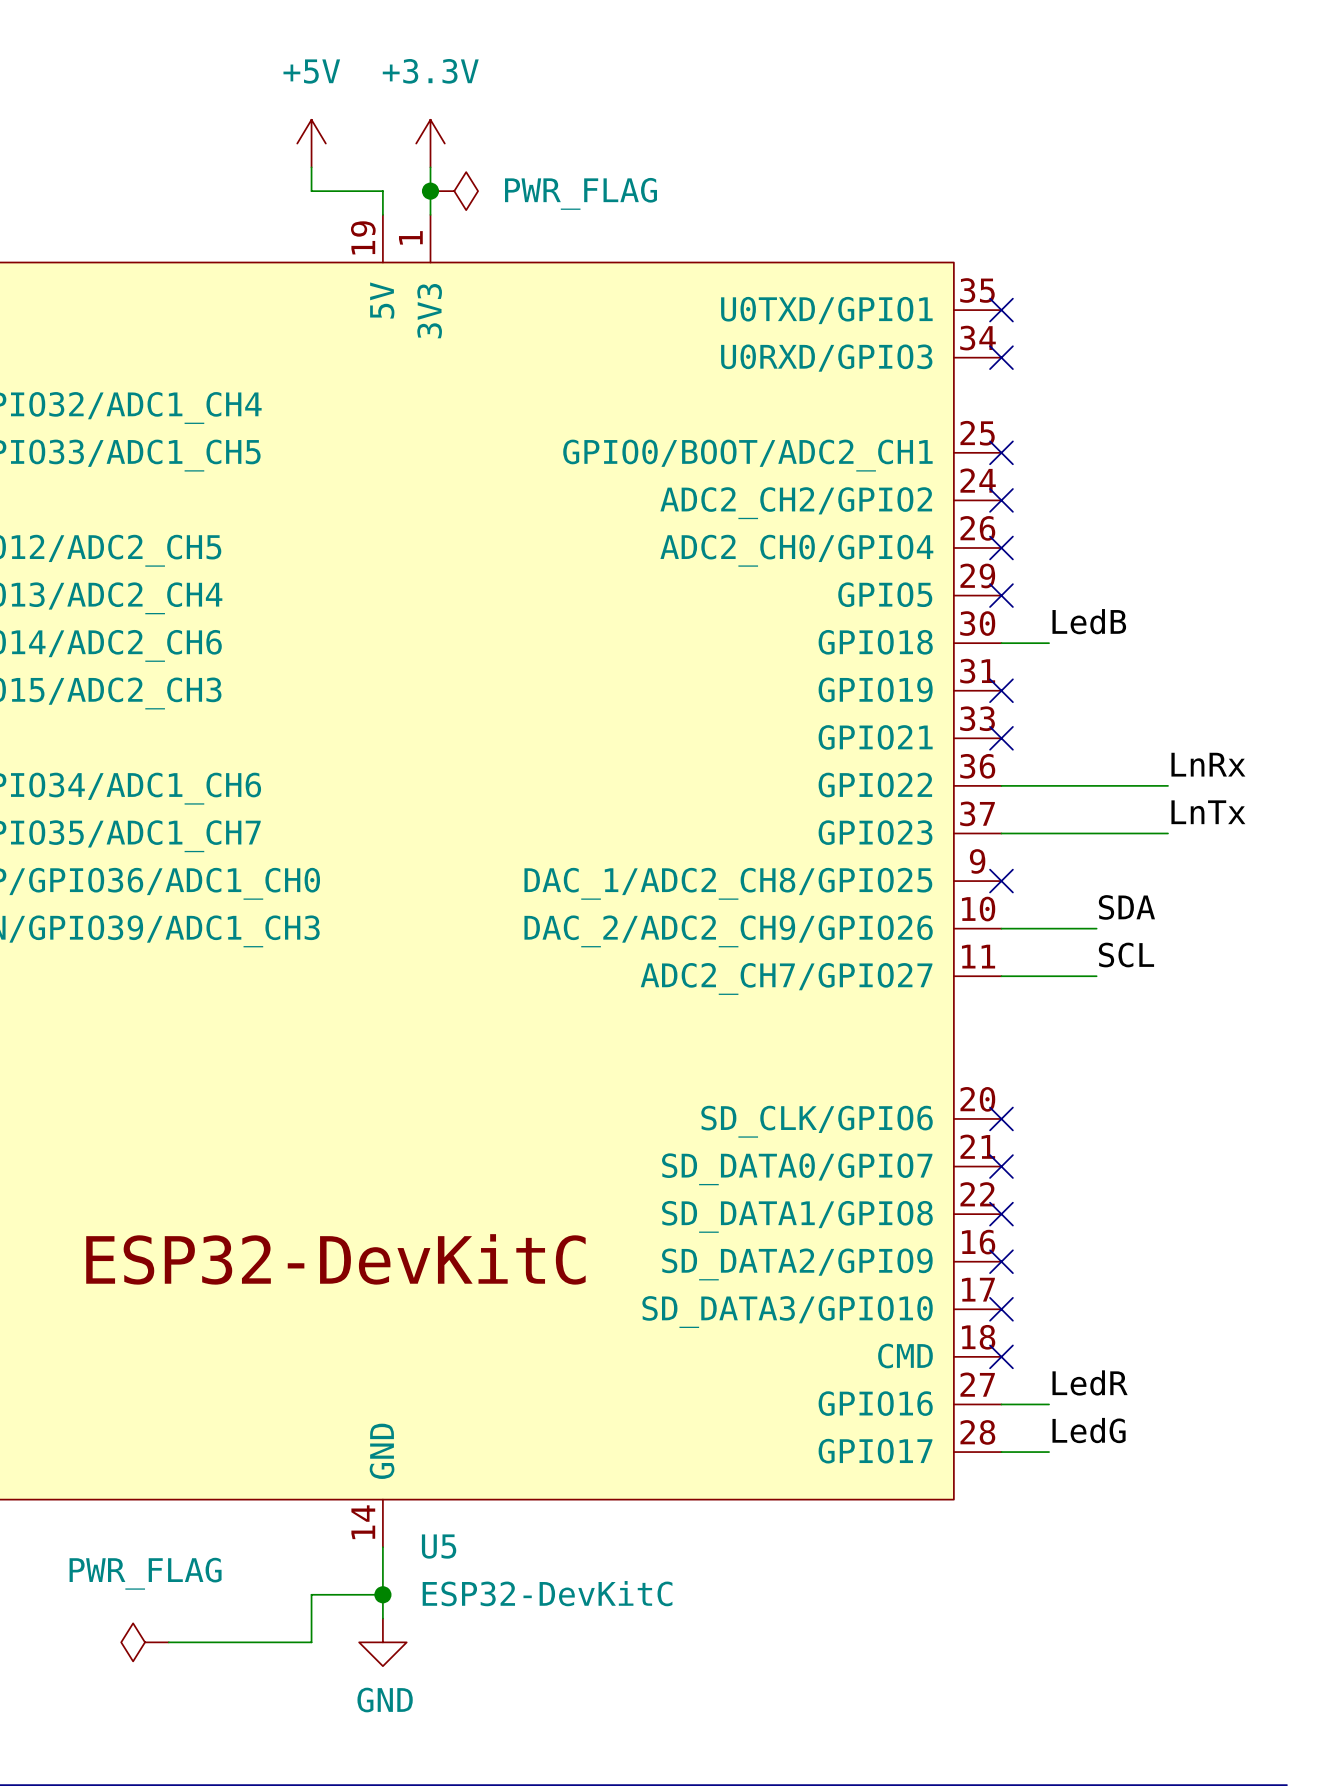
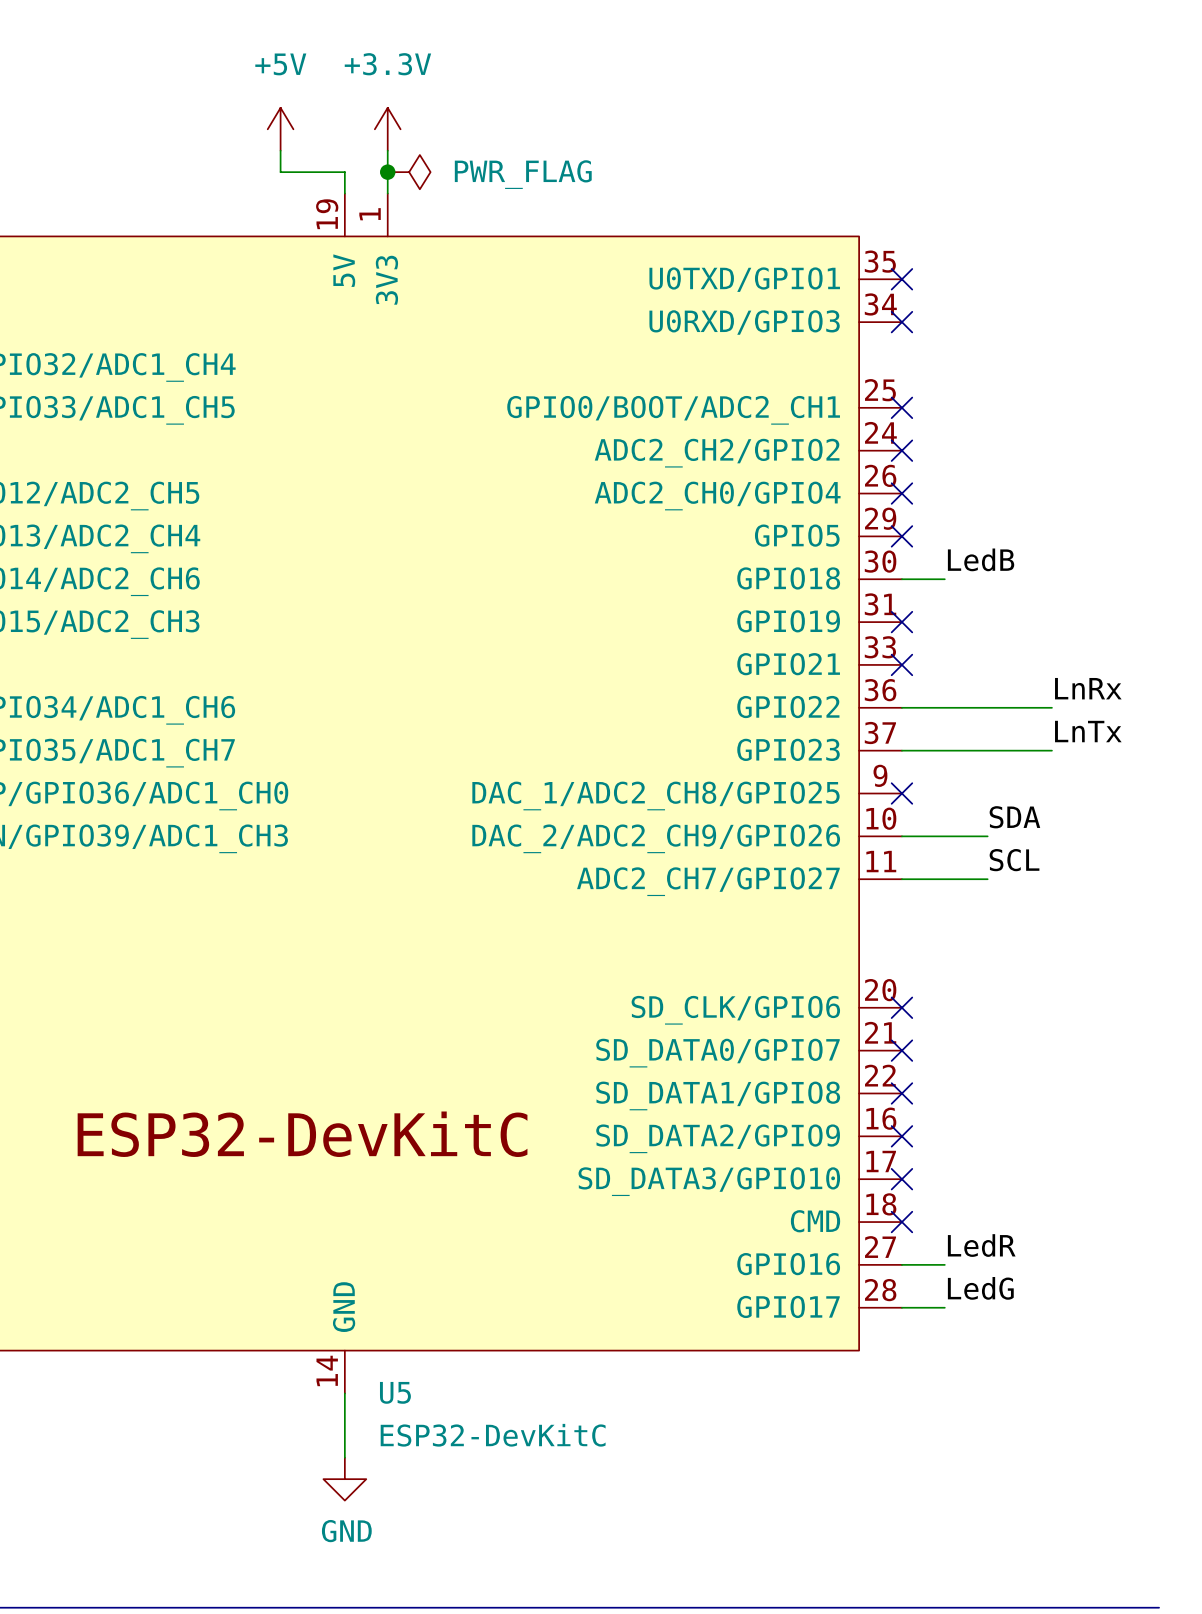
wire: (382, 1594) (311, 1594) (311, 1642) (168, 1642) -> none
junction: (382, 1594) -> none
power symbol: PWR_FLAG (145, 1642) -> none

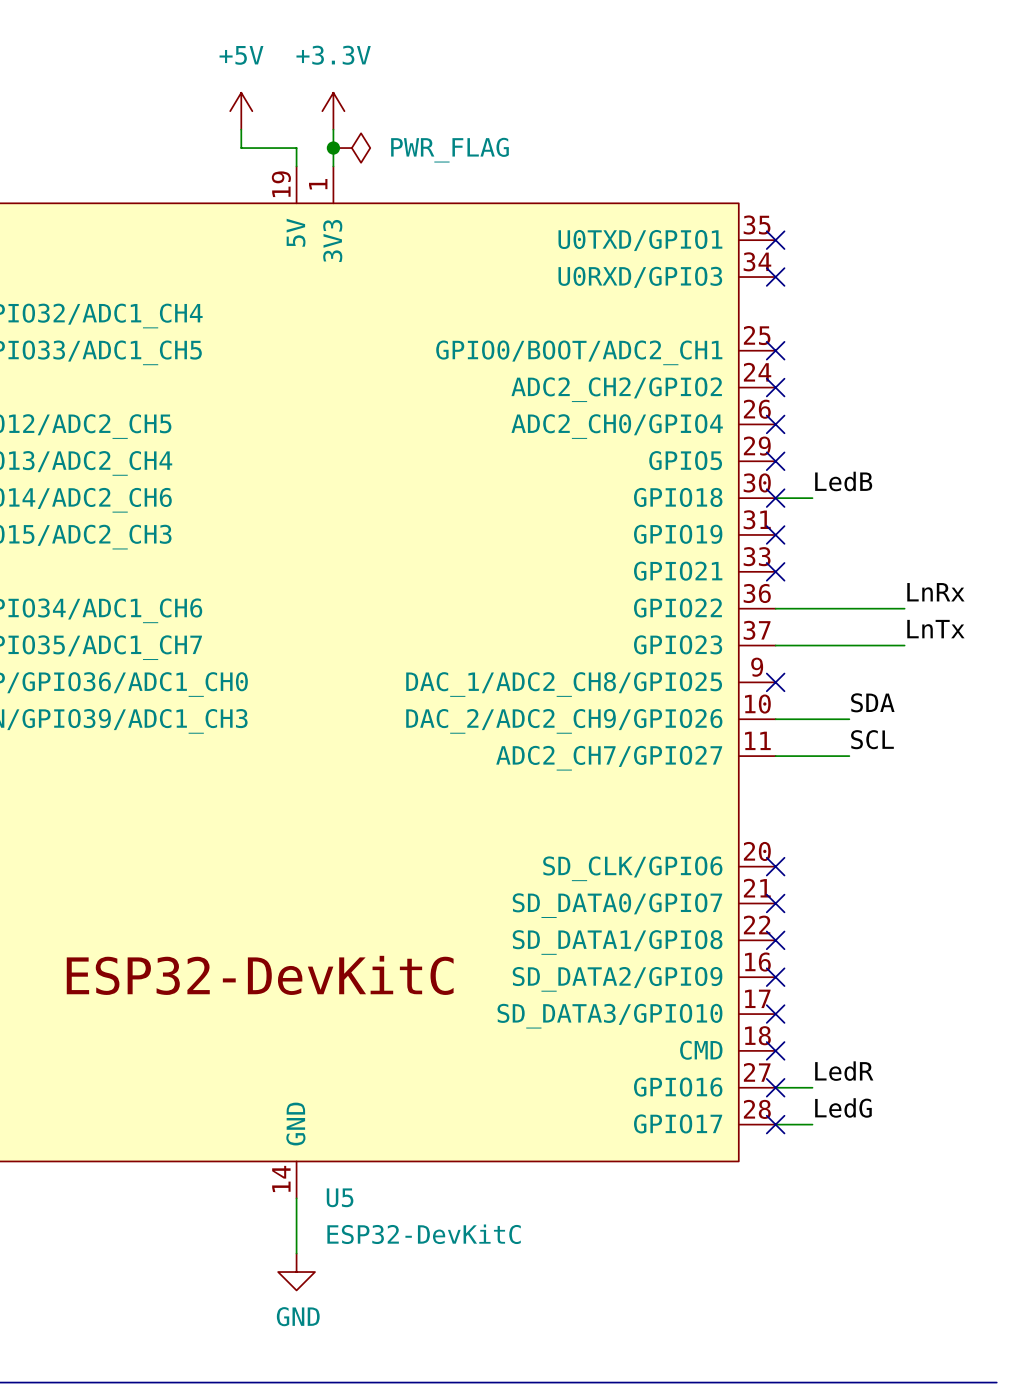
no-connect mark: none -> (775, 498)
no-connect mark: none -> (775, 1087)
no-connect mark: none -> (775, 1124)

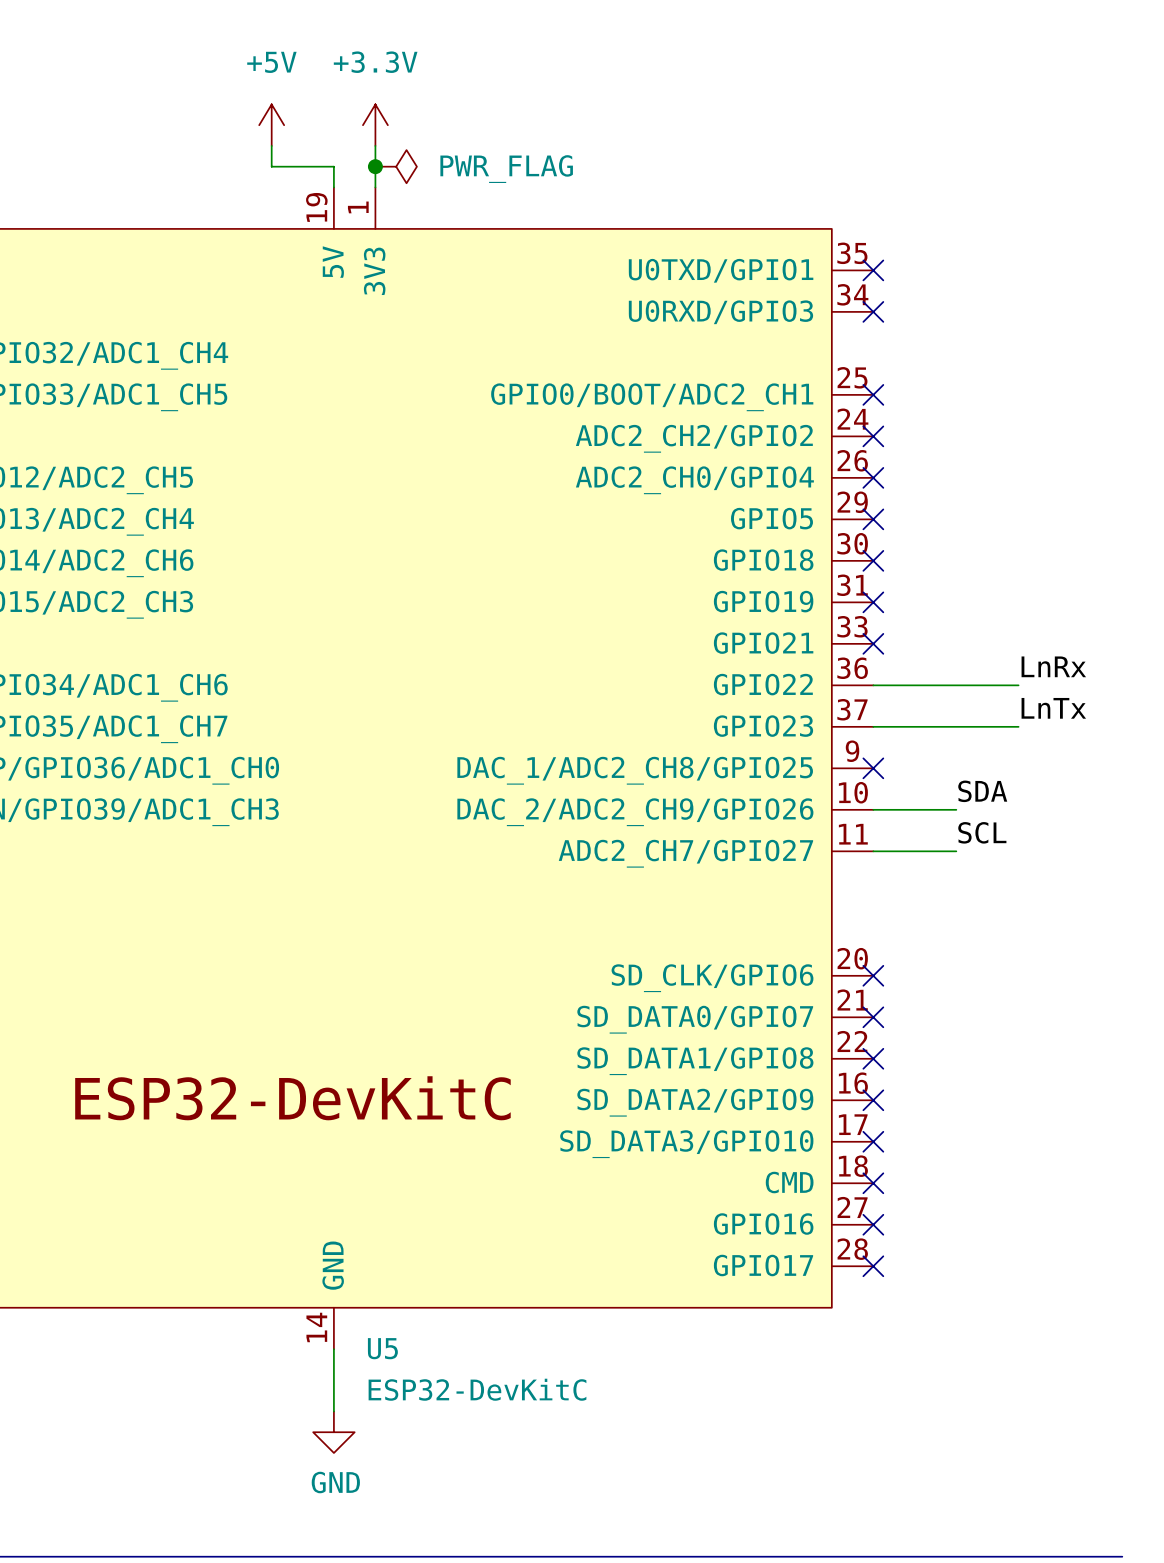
label: LedB (843, 481) -> none
wire: (775, 498) (812, 498) -> none
label: LedR (844, 1071) -> none
wire: (775, 1087) (812, 1087) -> none
label: LedG (843, 1107) -> none
wire: (775, 1124) (812, 1124) -> none

